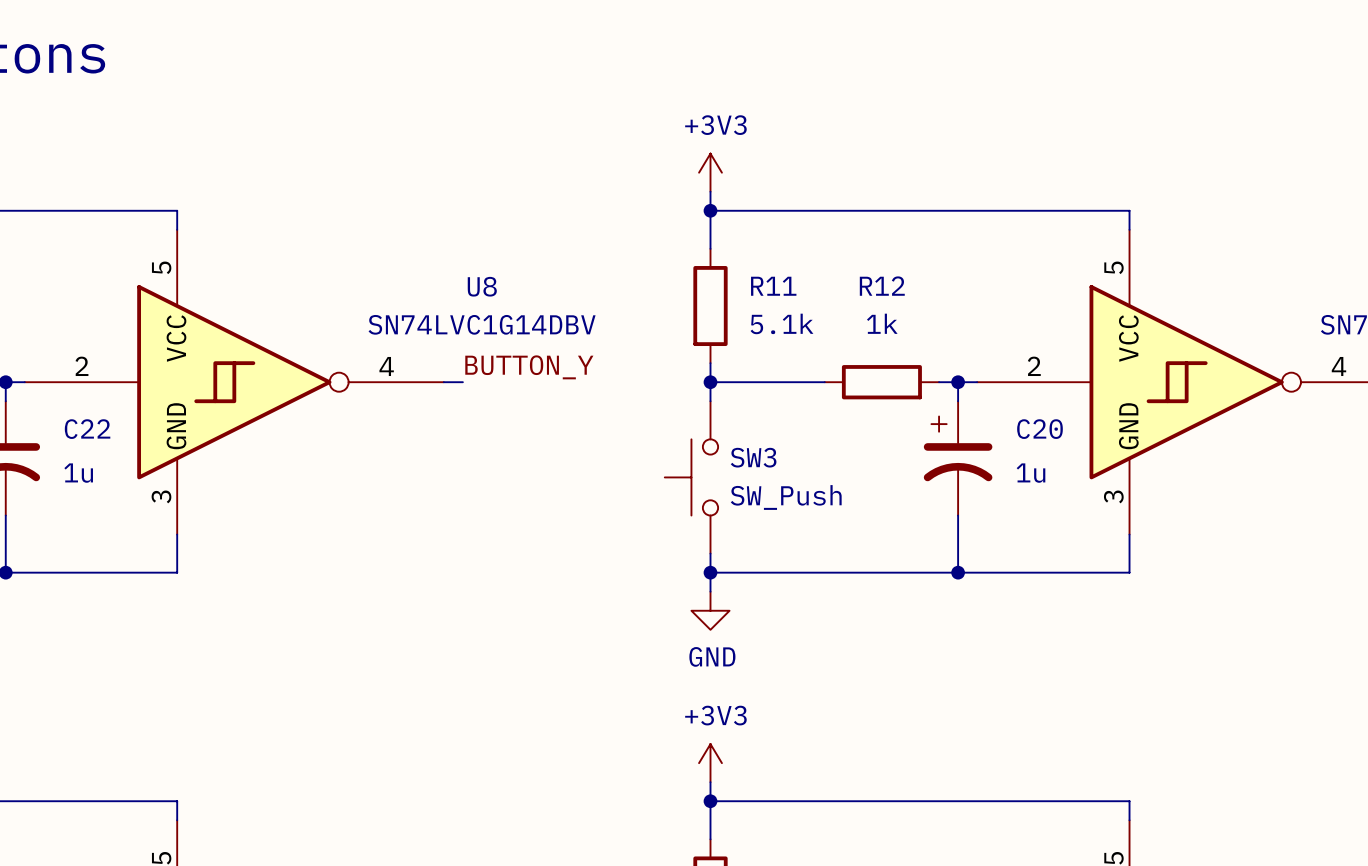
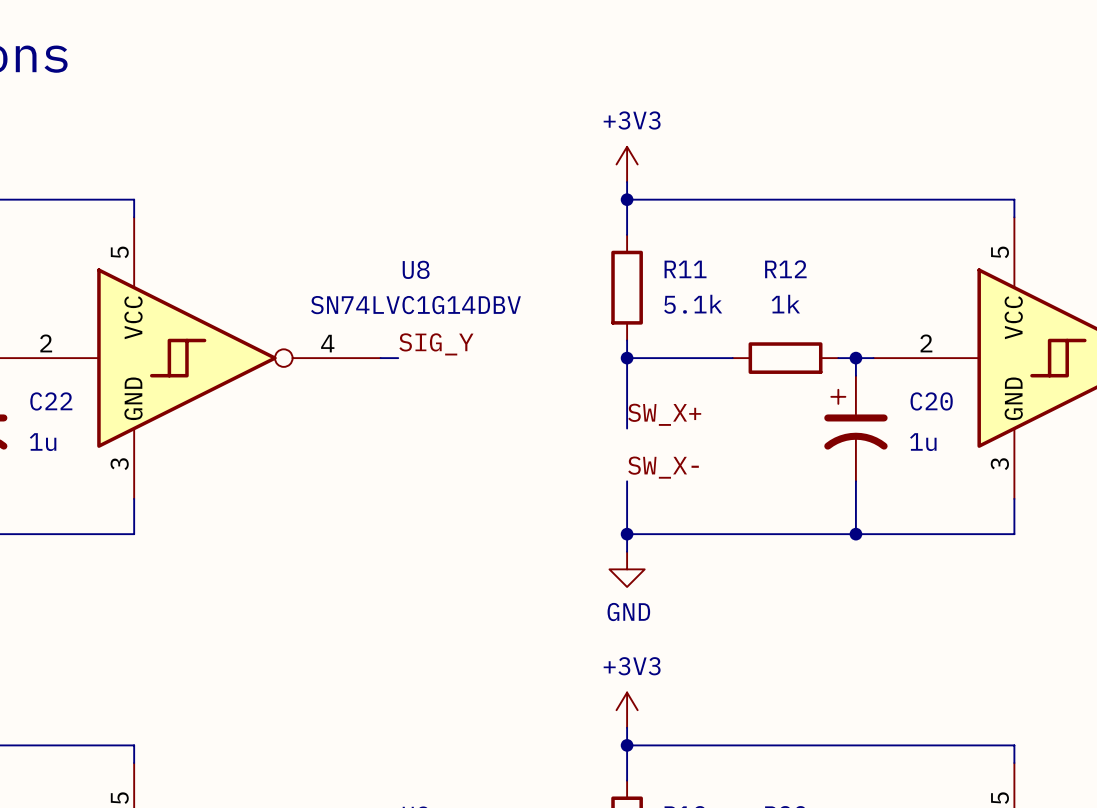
label: BUTTON_Y (529, 367) -> SIG_Y (436, 344)
label: none -> SW_X+ (664, 414)
SW3: SW_Push (691, 477) -> none
label: none -> SW_X- (663, 467)

